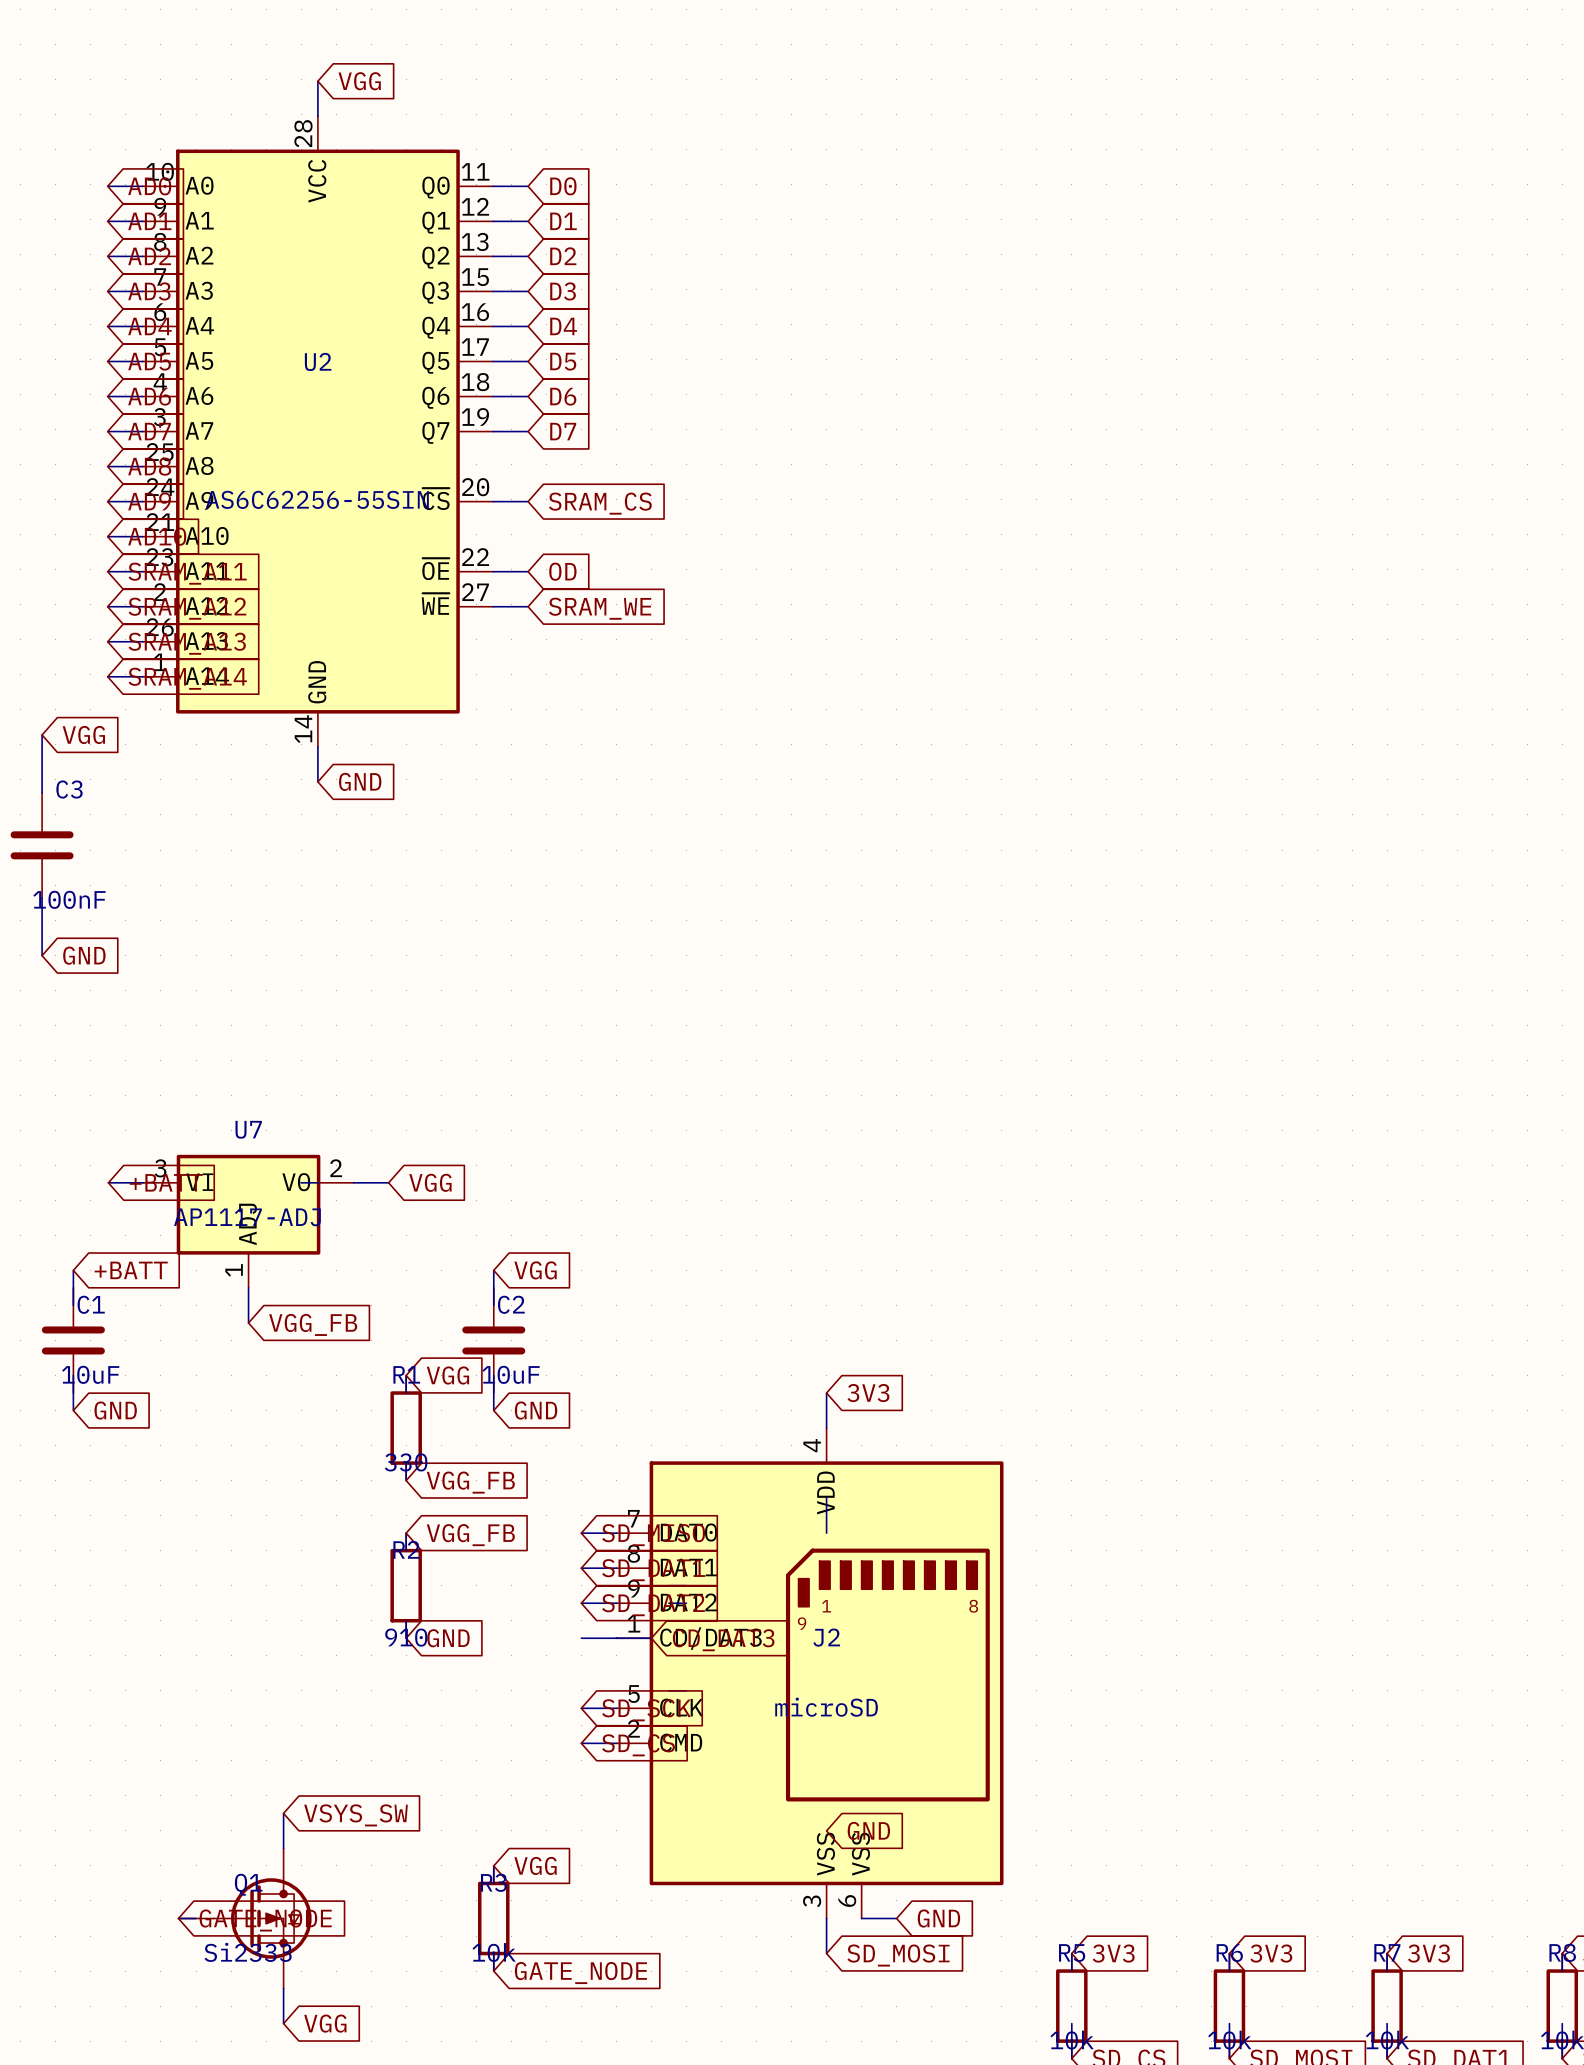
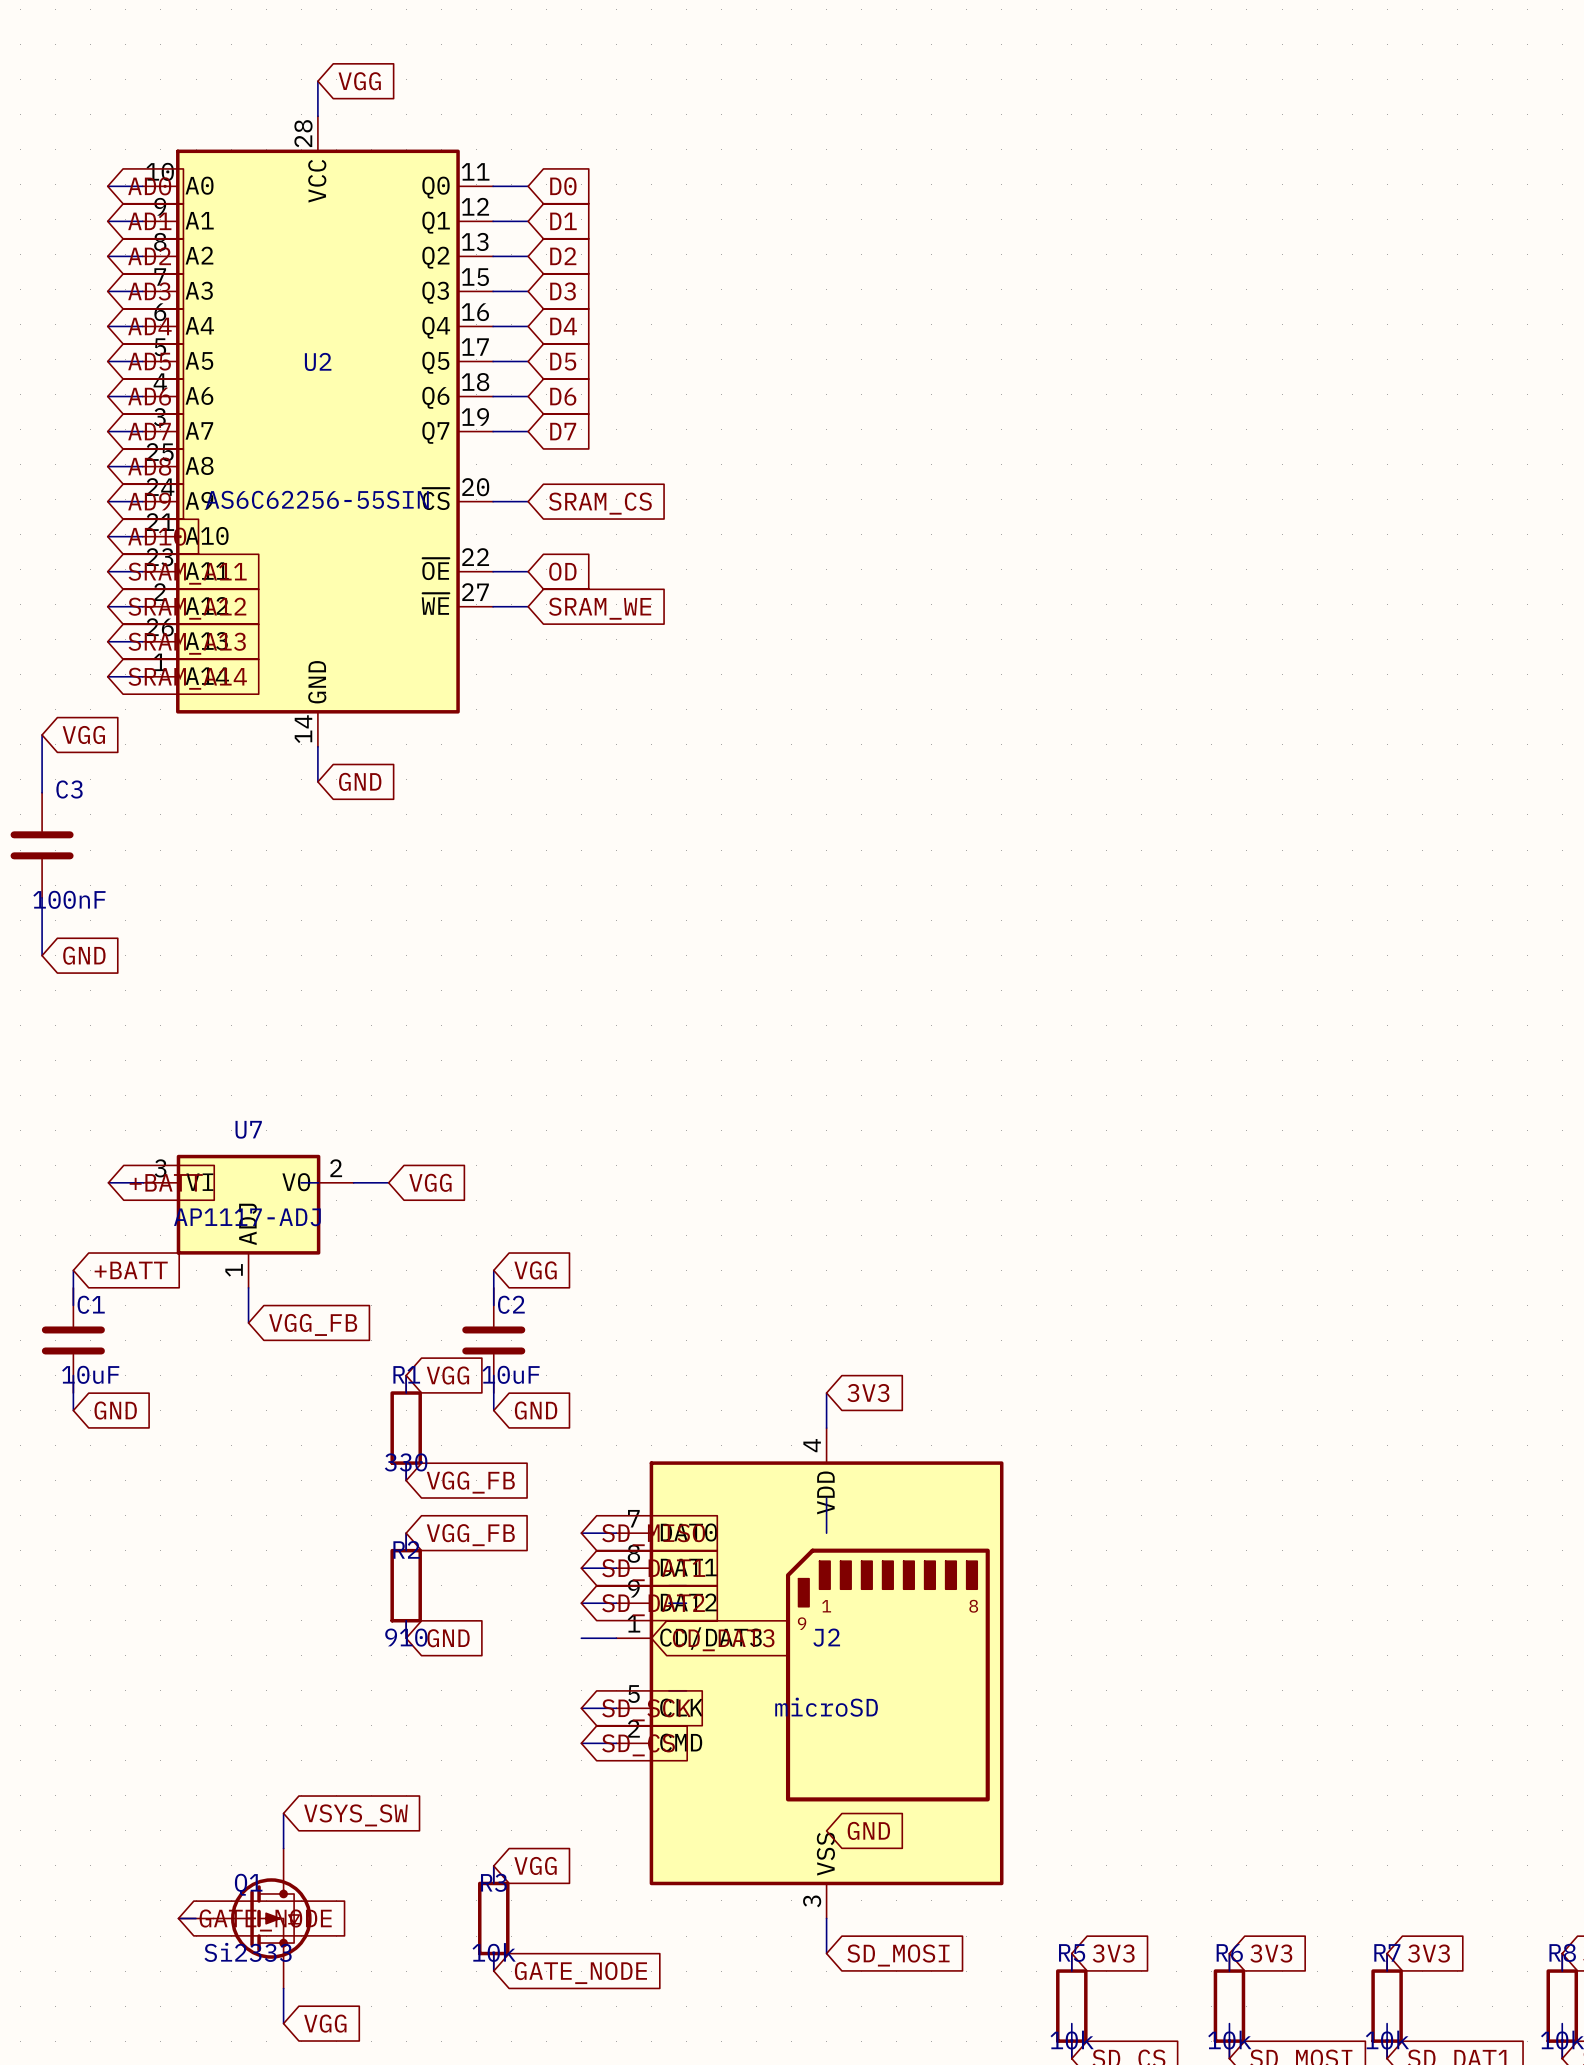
J2 symbol: [616, 1428, 1004, 1919] -> [616, 1428, 1004, 1919]
wire: (861, 1918) (896, 1918) -> none
global label: GND (938, 1918) -> none

